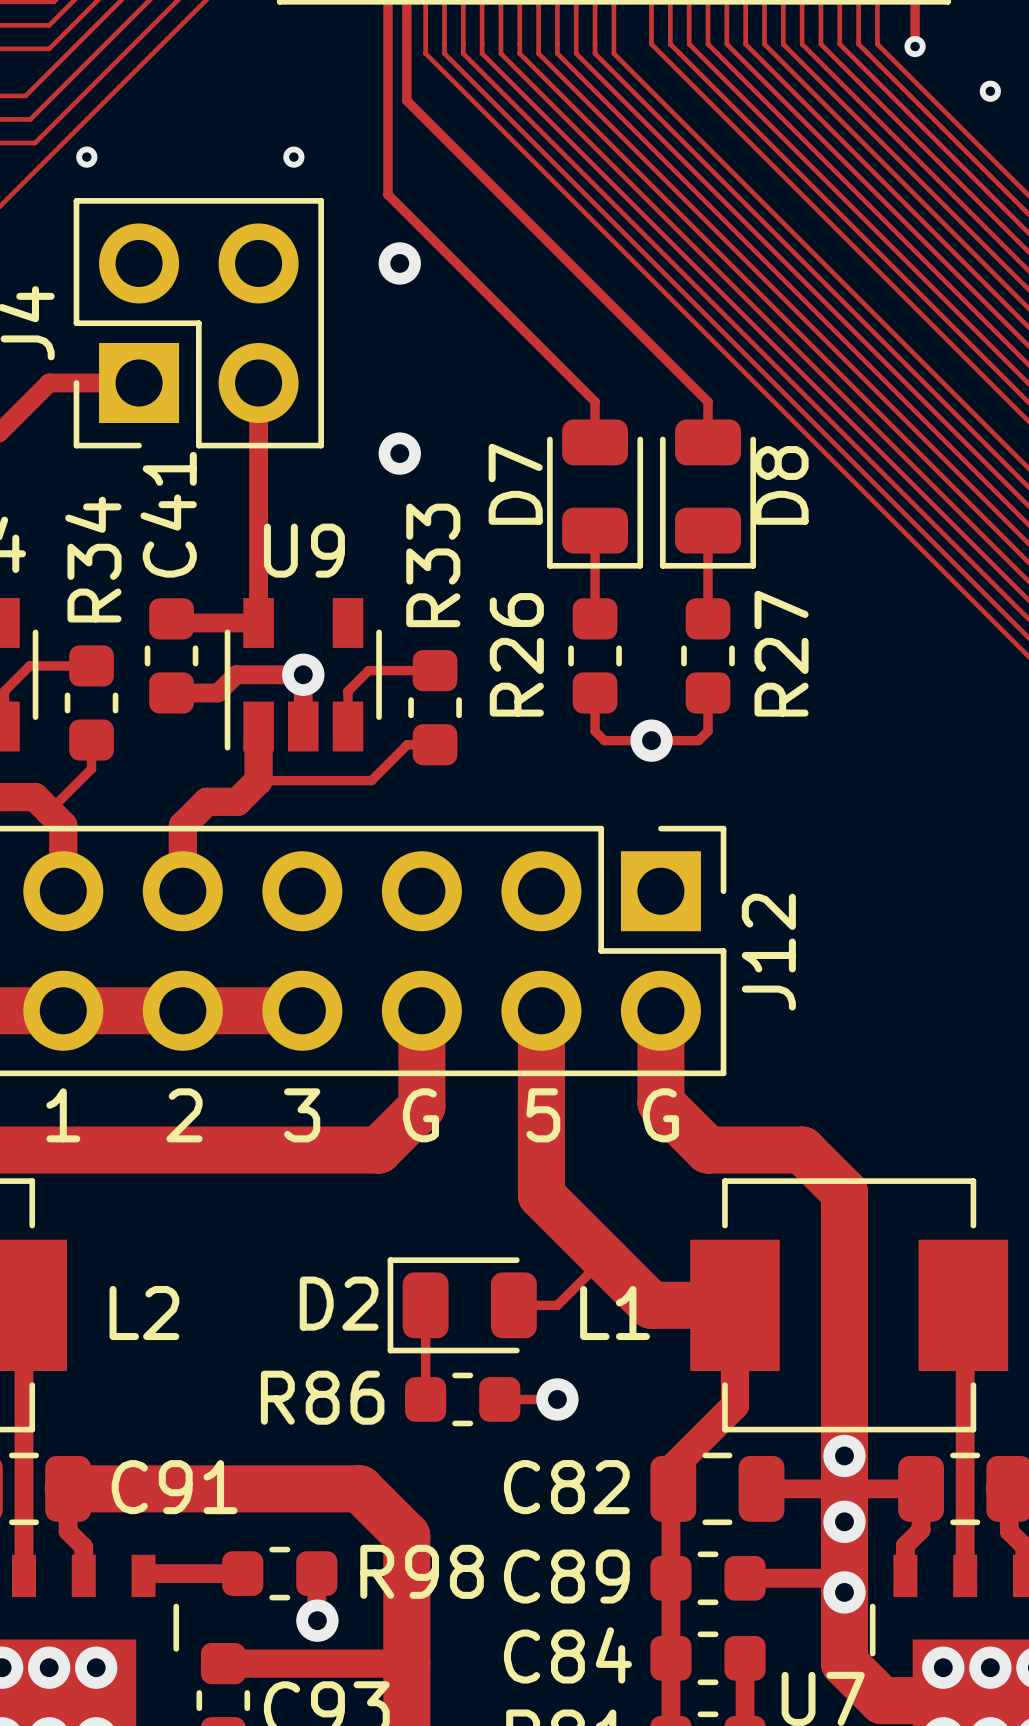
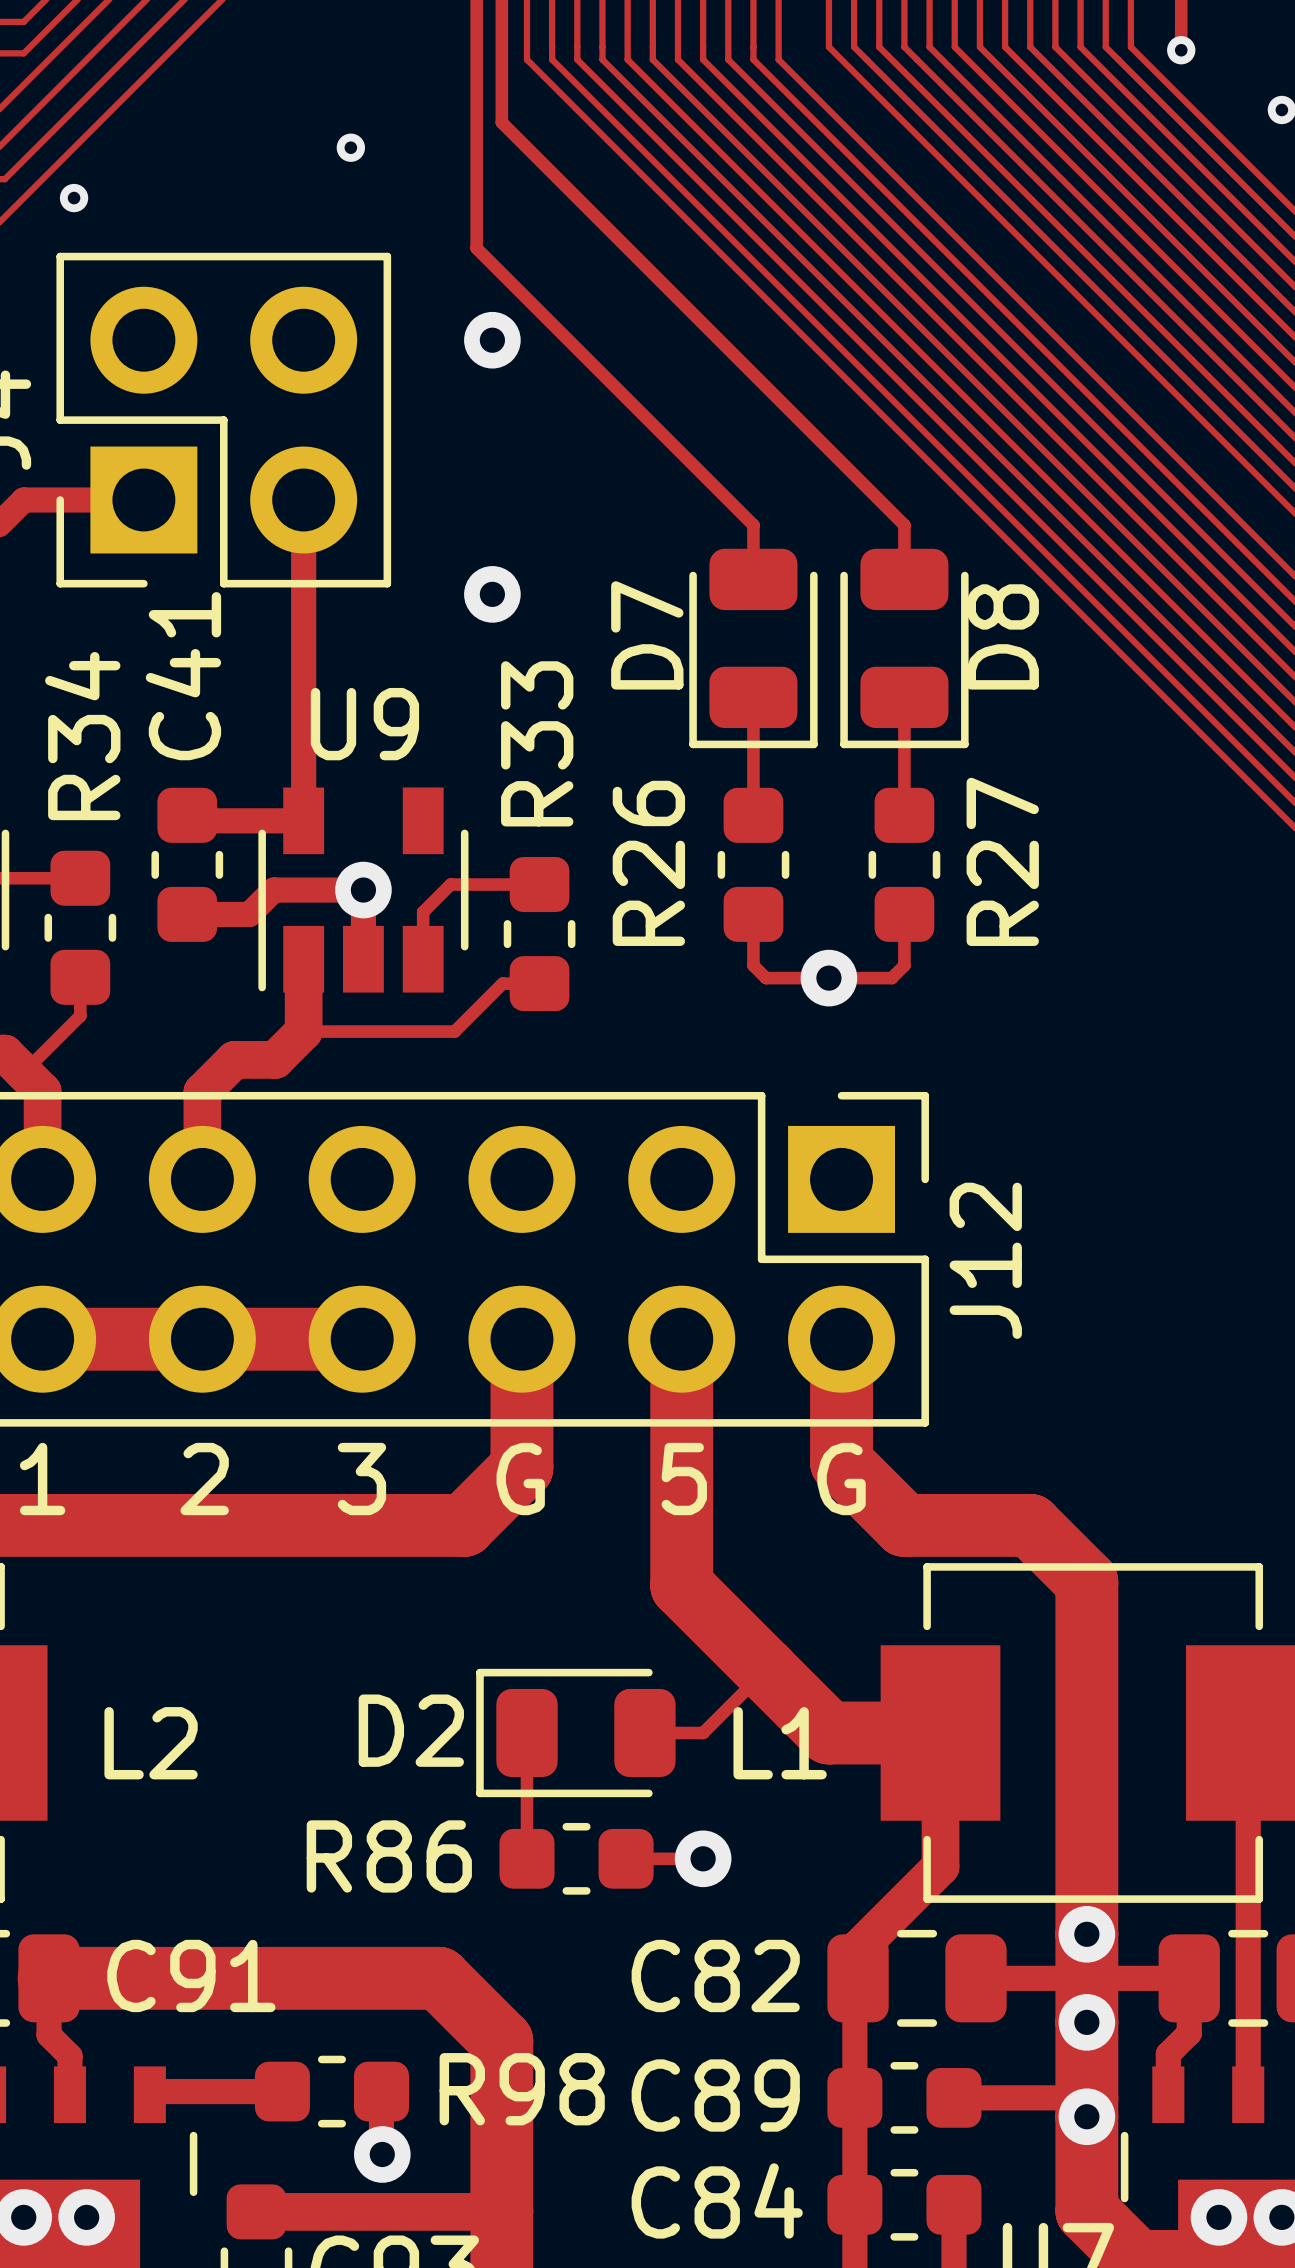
via position: (293, 157) -> (350, 147)

